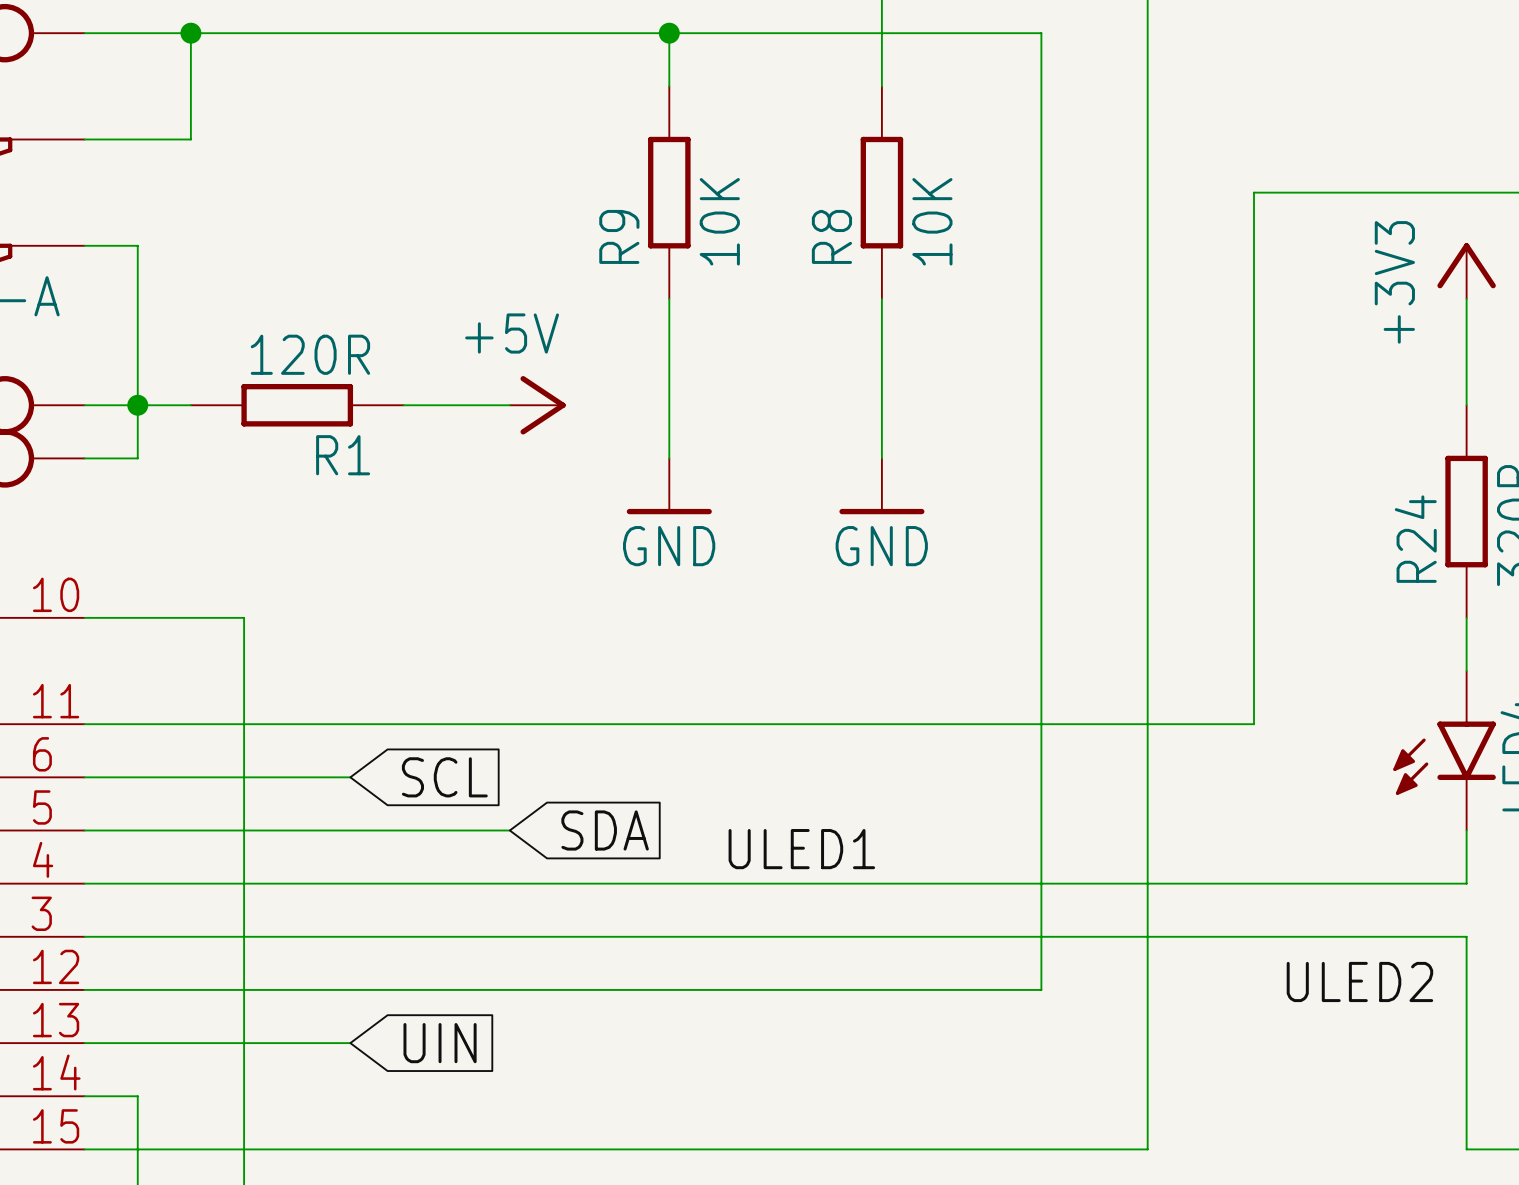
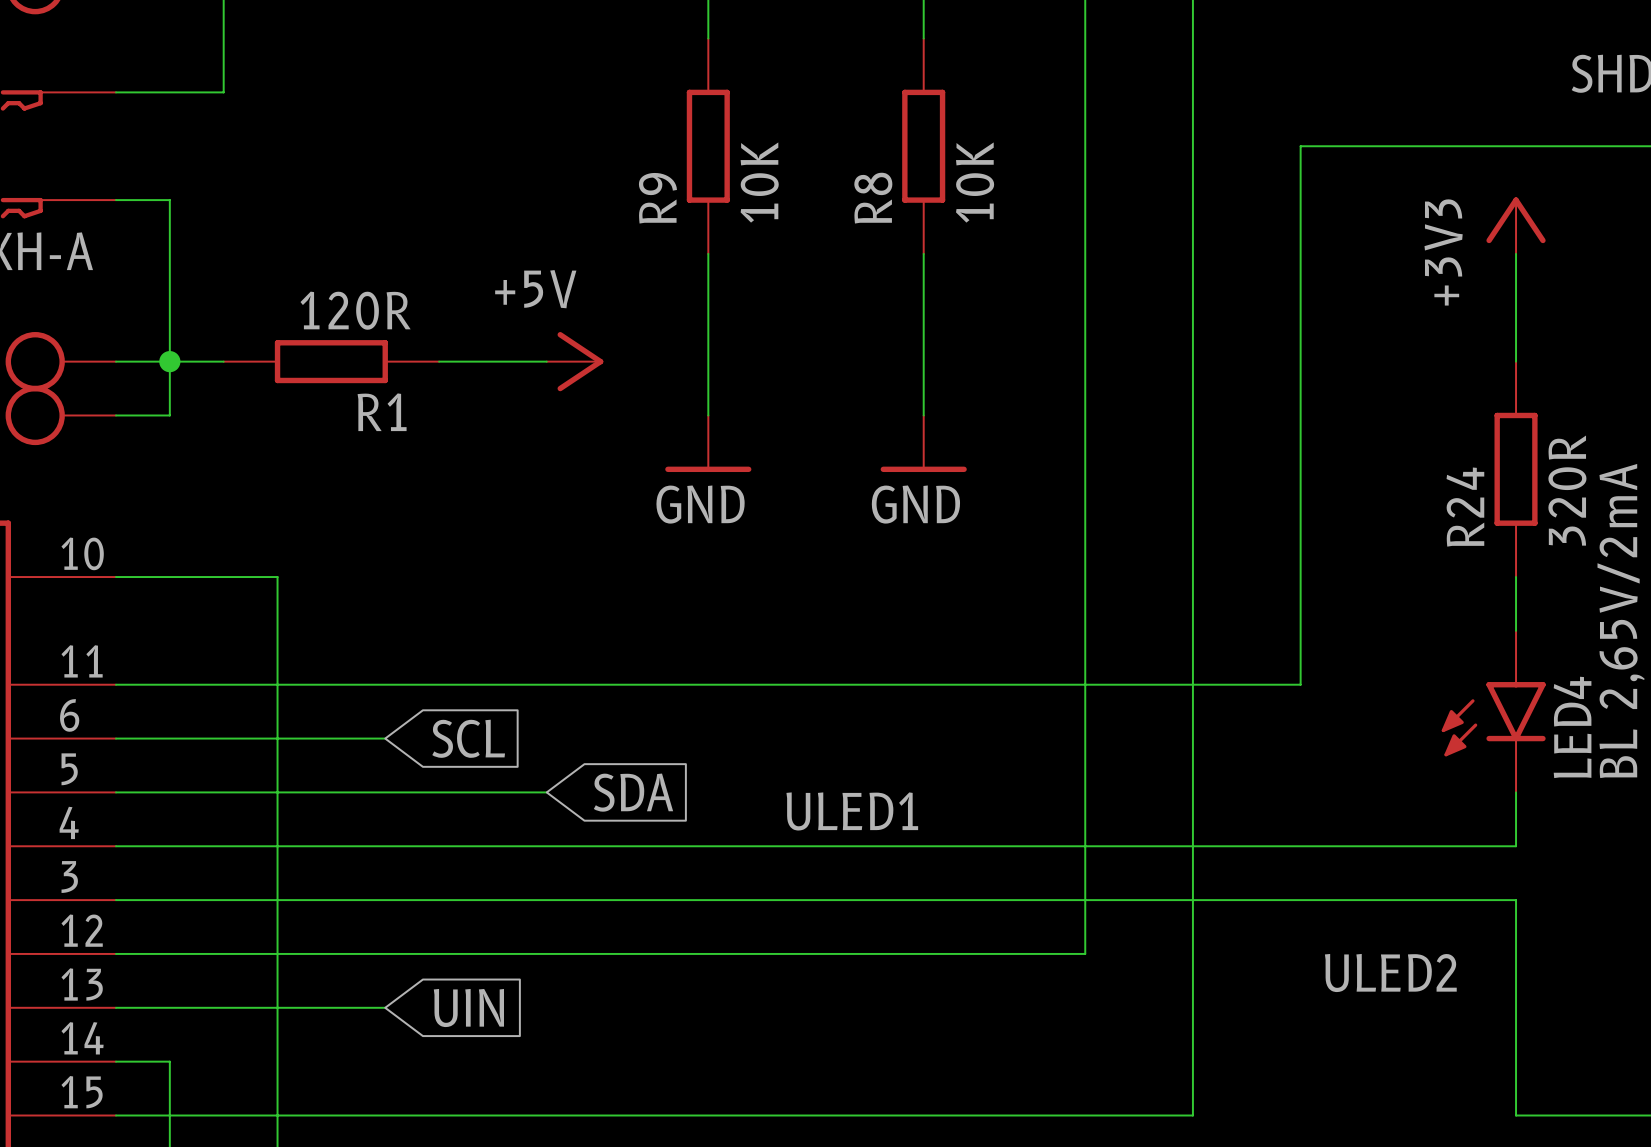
label position: ULED2 (1359, 981) -> ULED2 (1390, 973)

